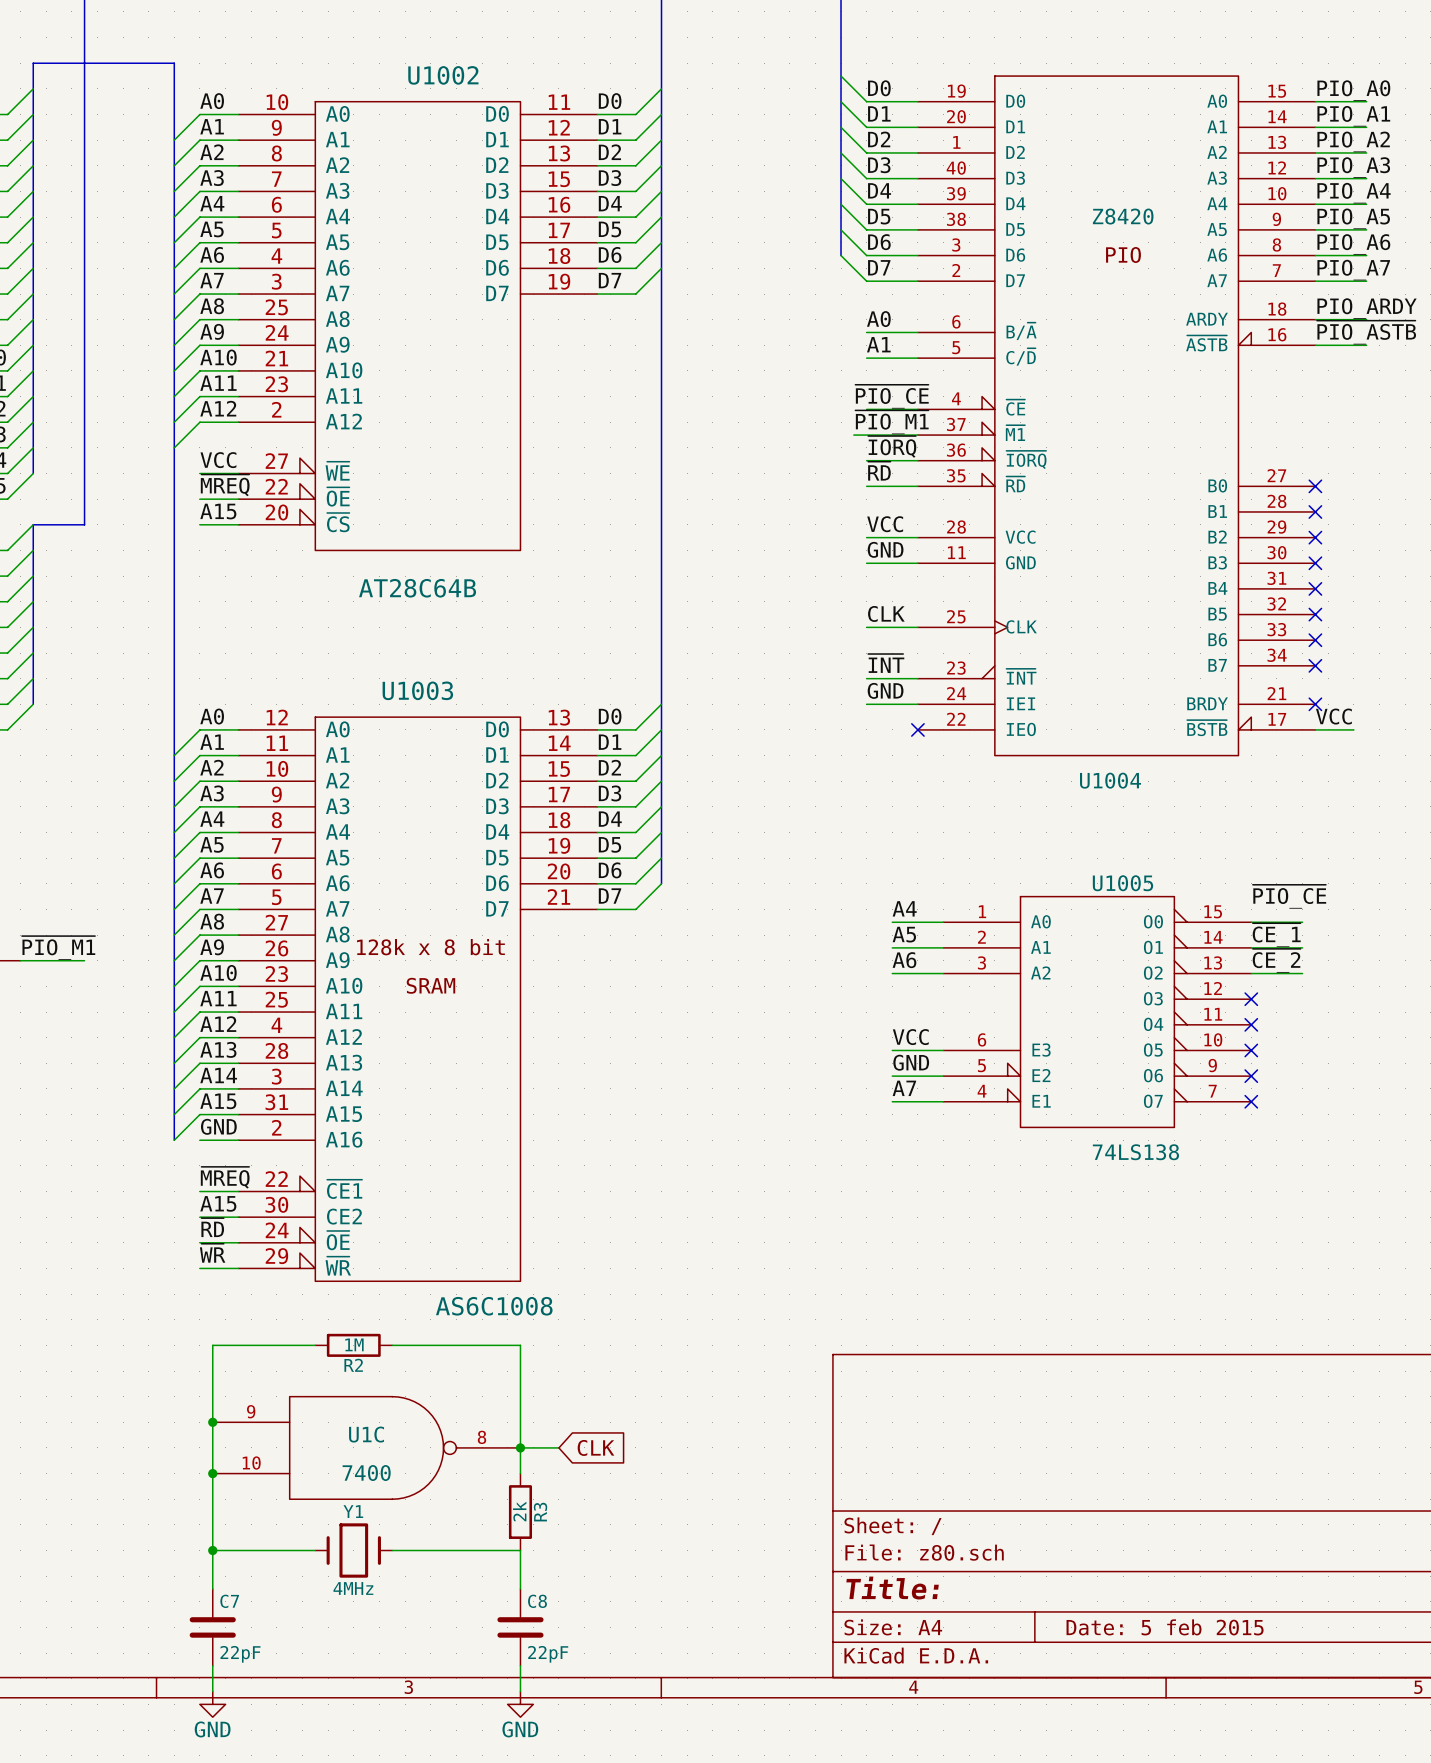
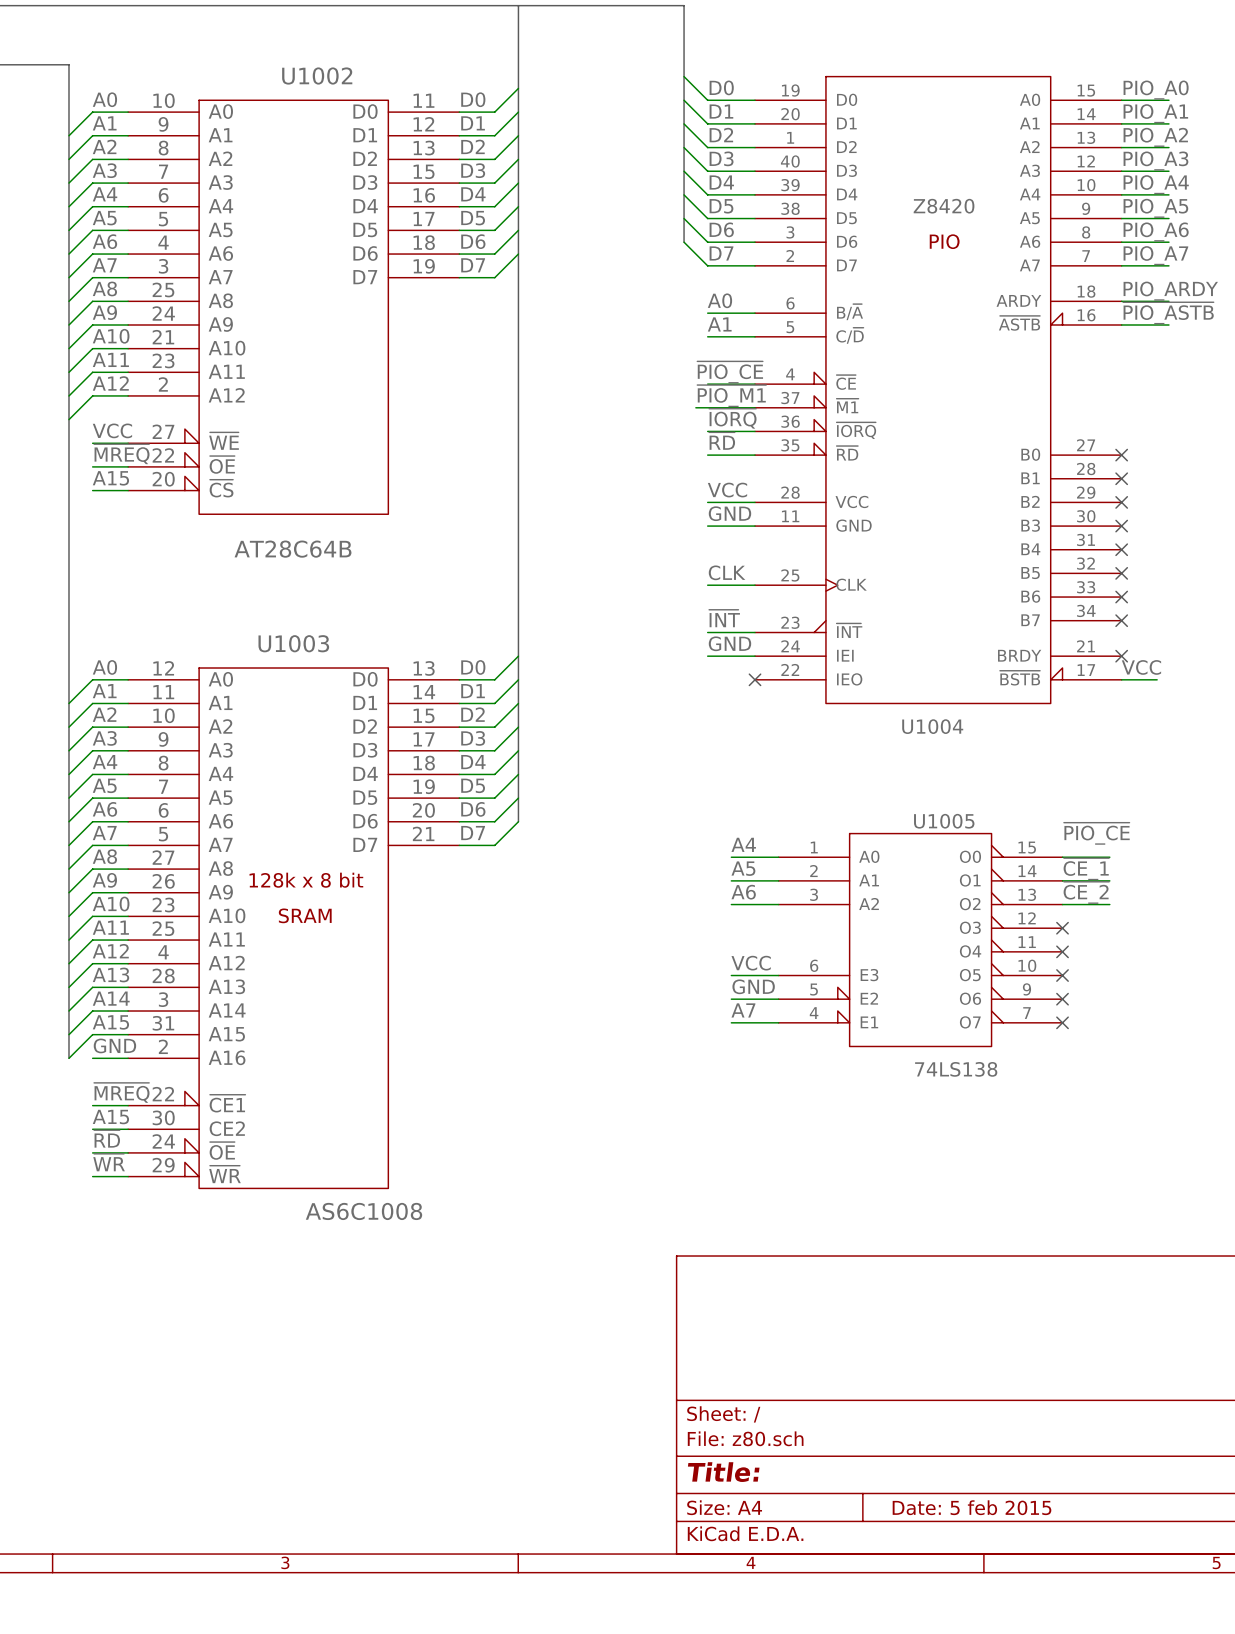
wire: (315, 1345) (212, 1345) (212, 1588) -> none
R2: 1M (353, 1345) -> none
wire: (392, 1345) (520, 1345) (520, 1473) -> none
junction: (212, 1422) -> none
U1C: 7400 (366, 1447) -> none
wire: (520, 1447) (558, 1447) -> none
junction: (520, 1447) -> none
global label: CLK (595, 1447) -> none
junction: (212, 1473) -> none
R3: 2k (520, 1512) -> none
wire: (212, 1550) (315, 1550) -> none
junction: (212, 1550) -> none
Y1: 4MHz (353, 1550) -> none
wire: (392, 1550) (520, 1550) (520, 1588) -> none
C7: 22pF (212, 1627) -> none
C8: 22pF (520, 1627) -> none
wire: (212, 1665) (212, 1691) -> none
wire: (520, 1665) (520, 1691) -> none
power symbol: GND (212, 1704) -> none
power symbol: GND (520, 1704) -> none

